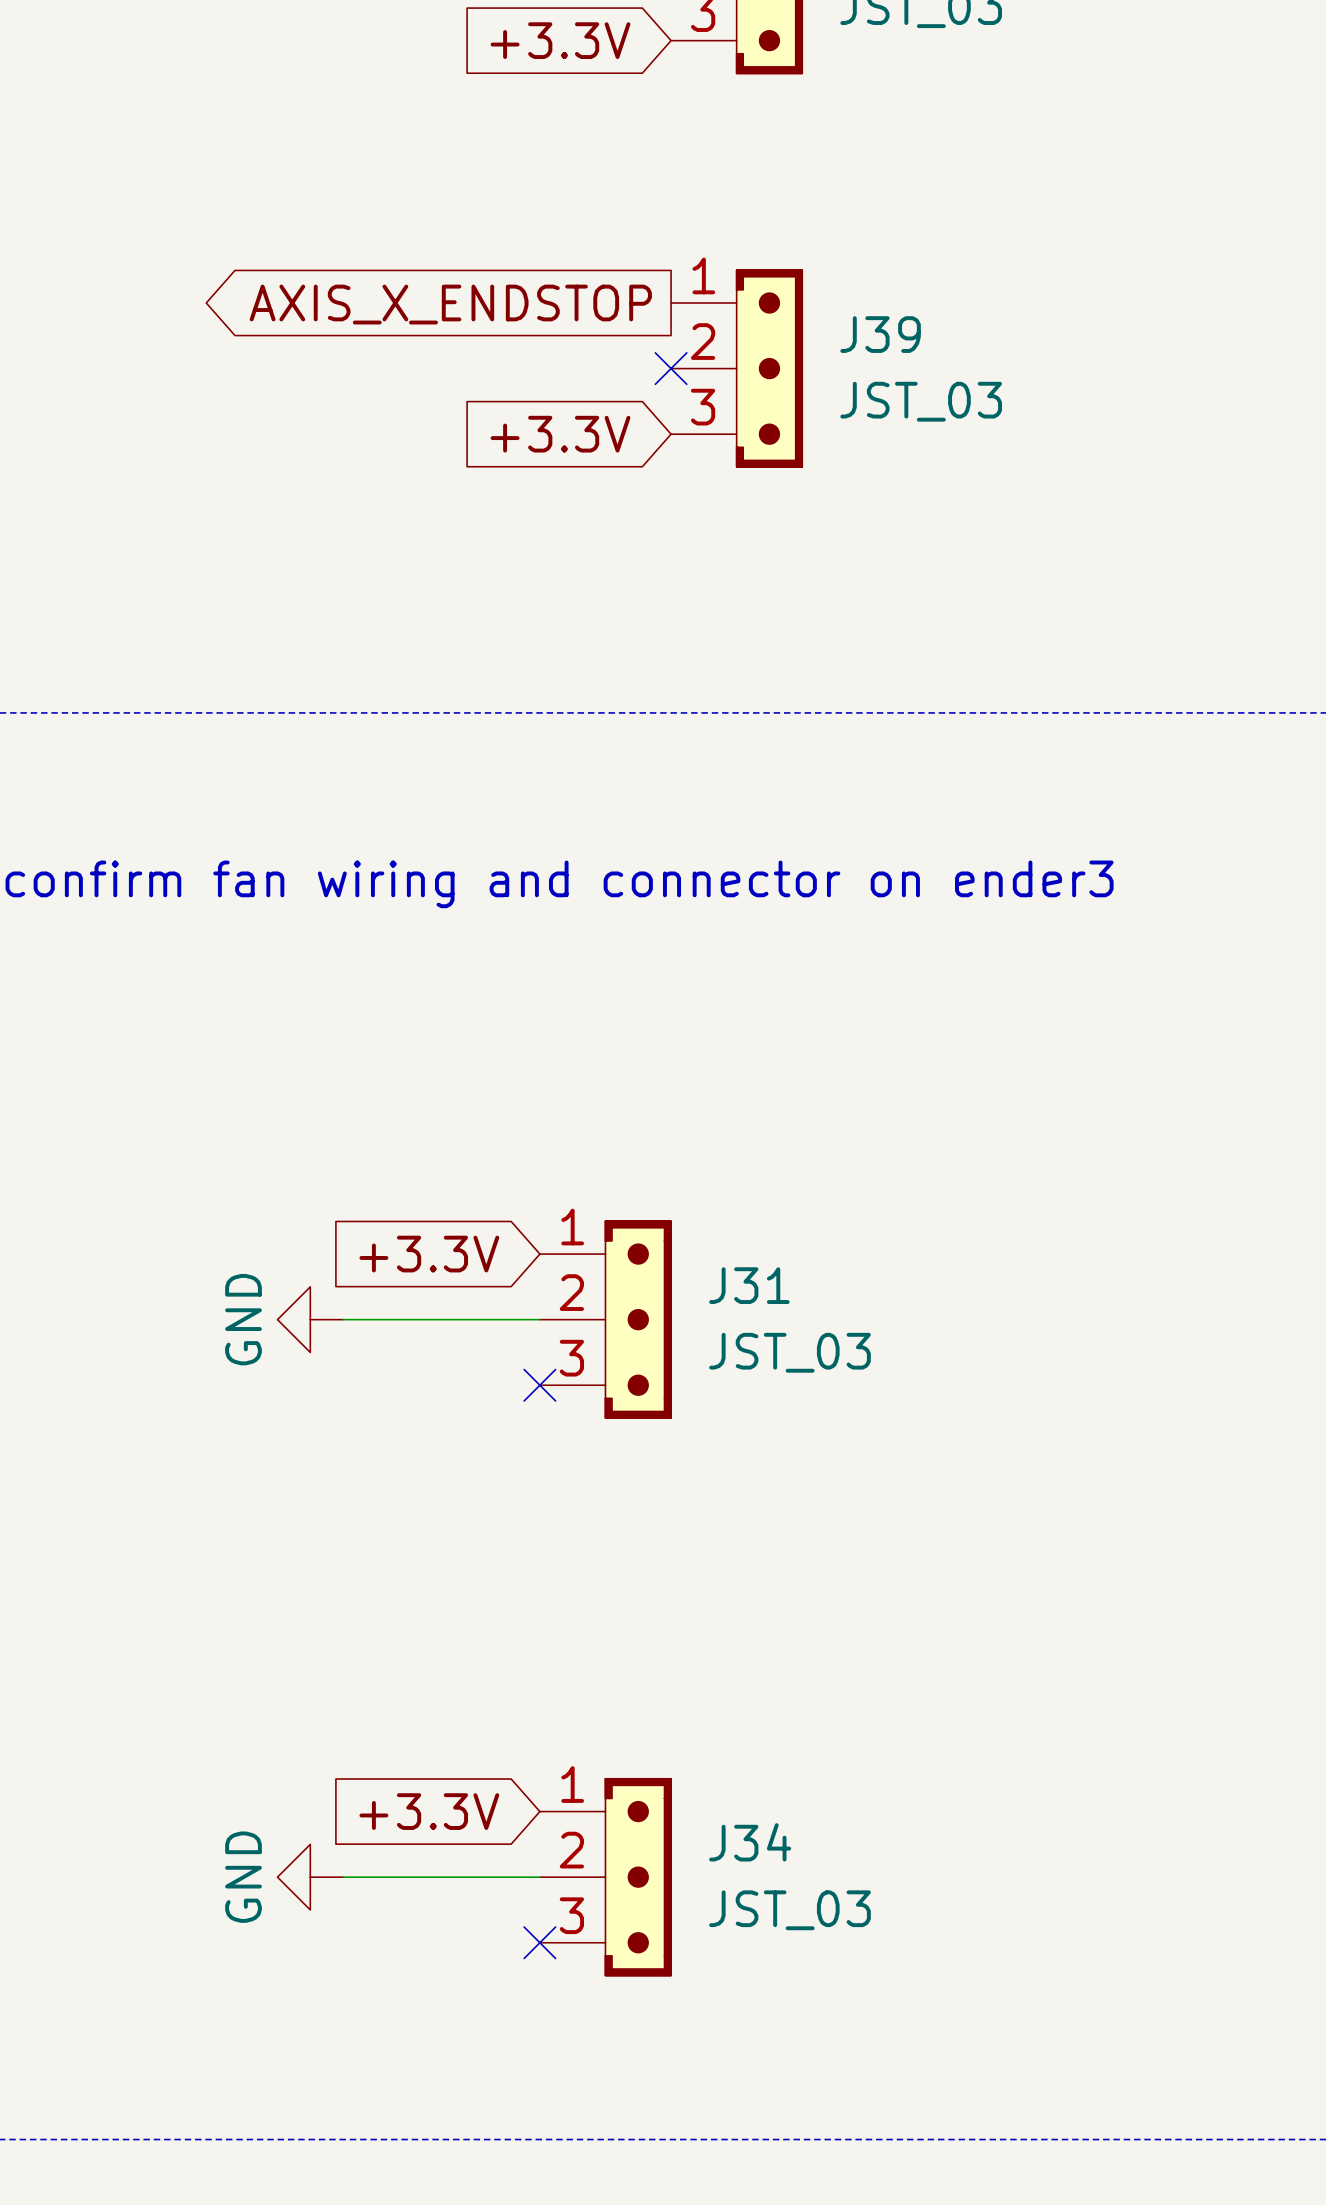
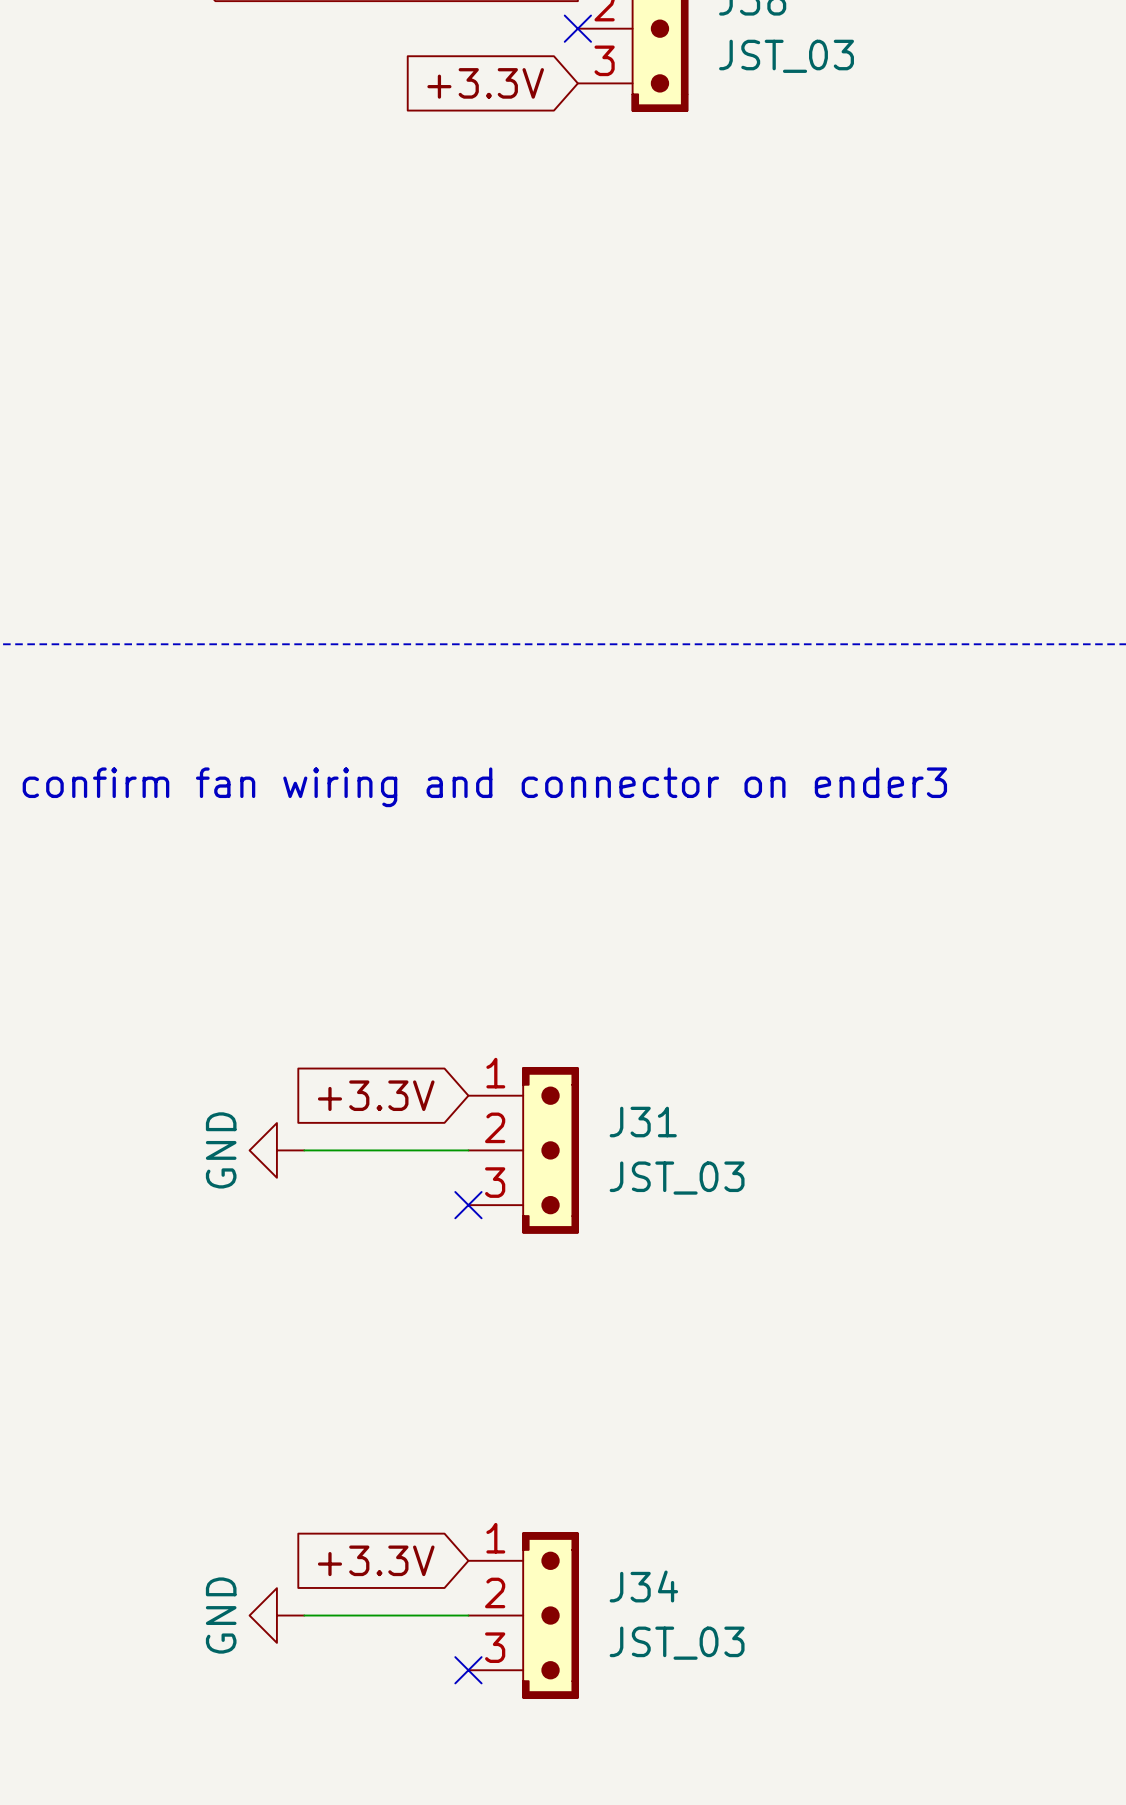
global label: AXIS_X_ENDSTOP (450, 304) -> none
no-connect mark: (671, 368) -> none
J39: JST_03 (736, 368) -> none
global label: +3.3V (560, 434) -> none

